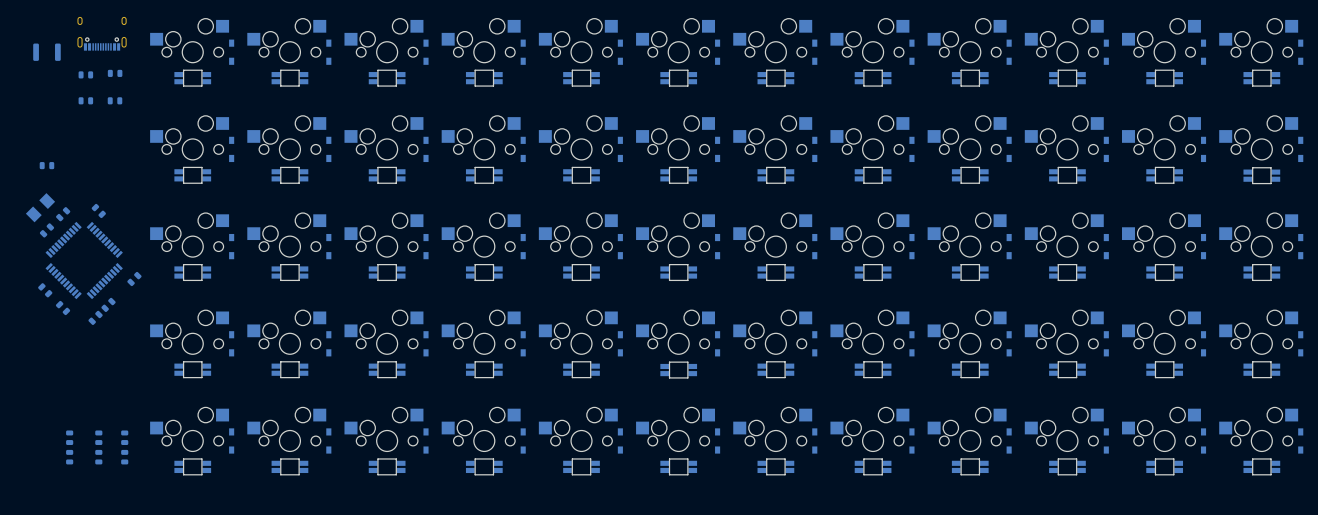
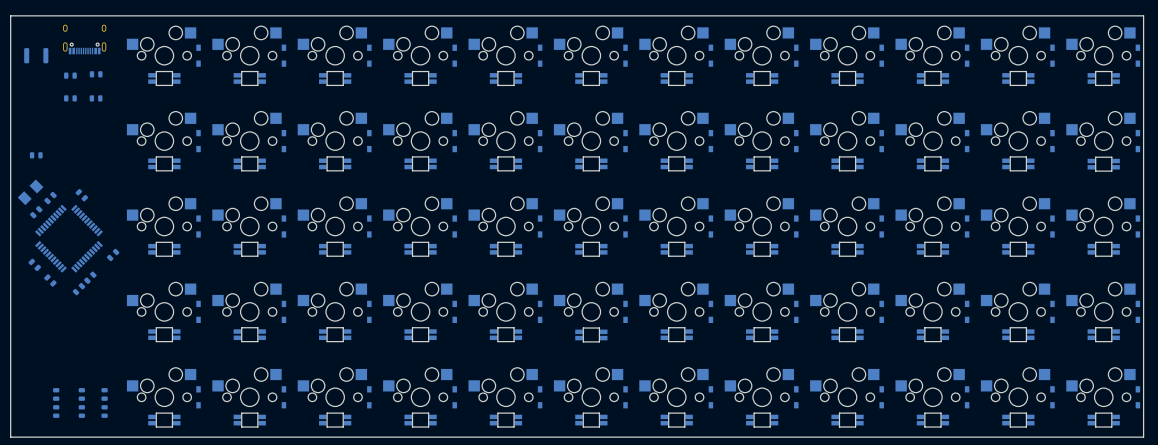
board edge: none -> (10, 15) (10, 437) (1143, 437) (1143, 15) (10, 15)

